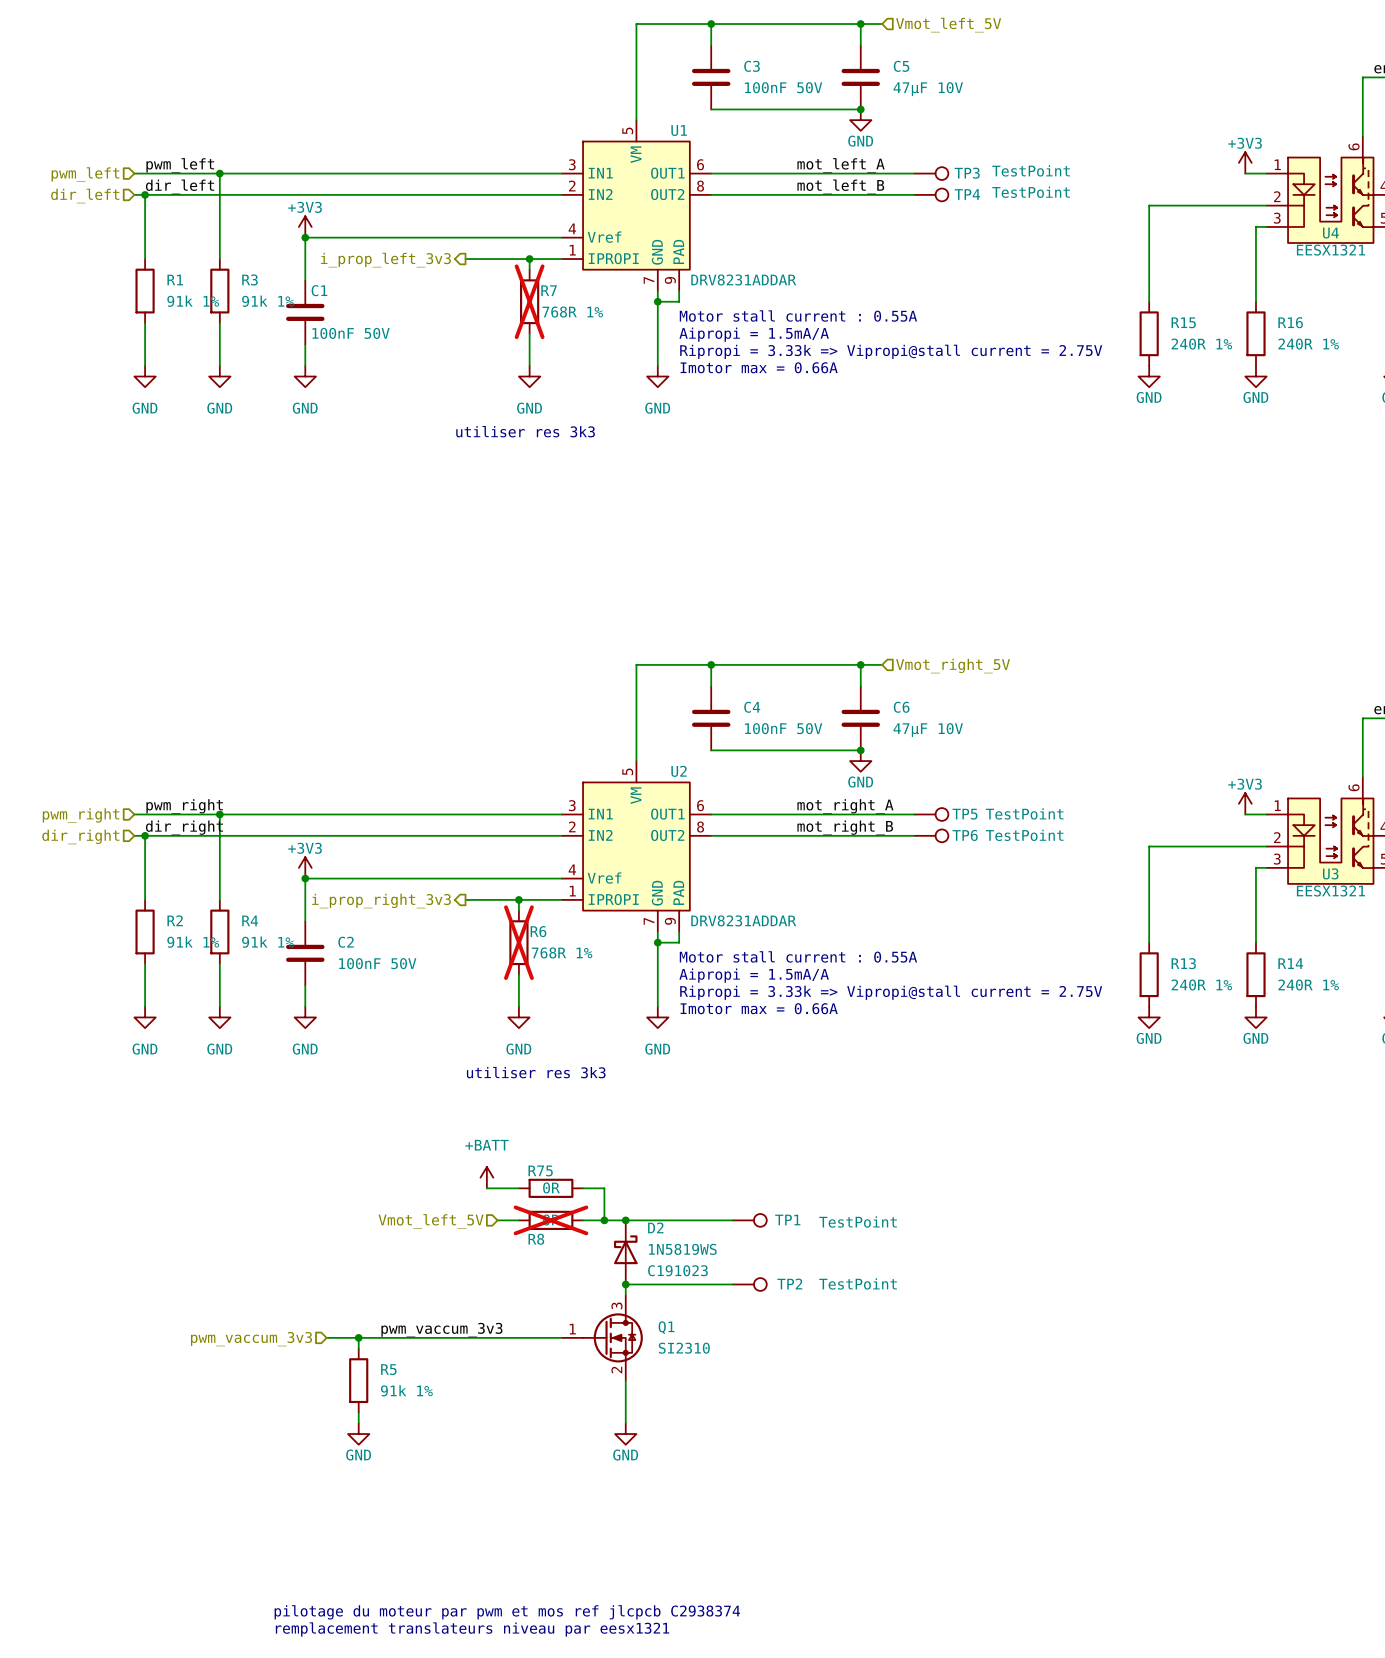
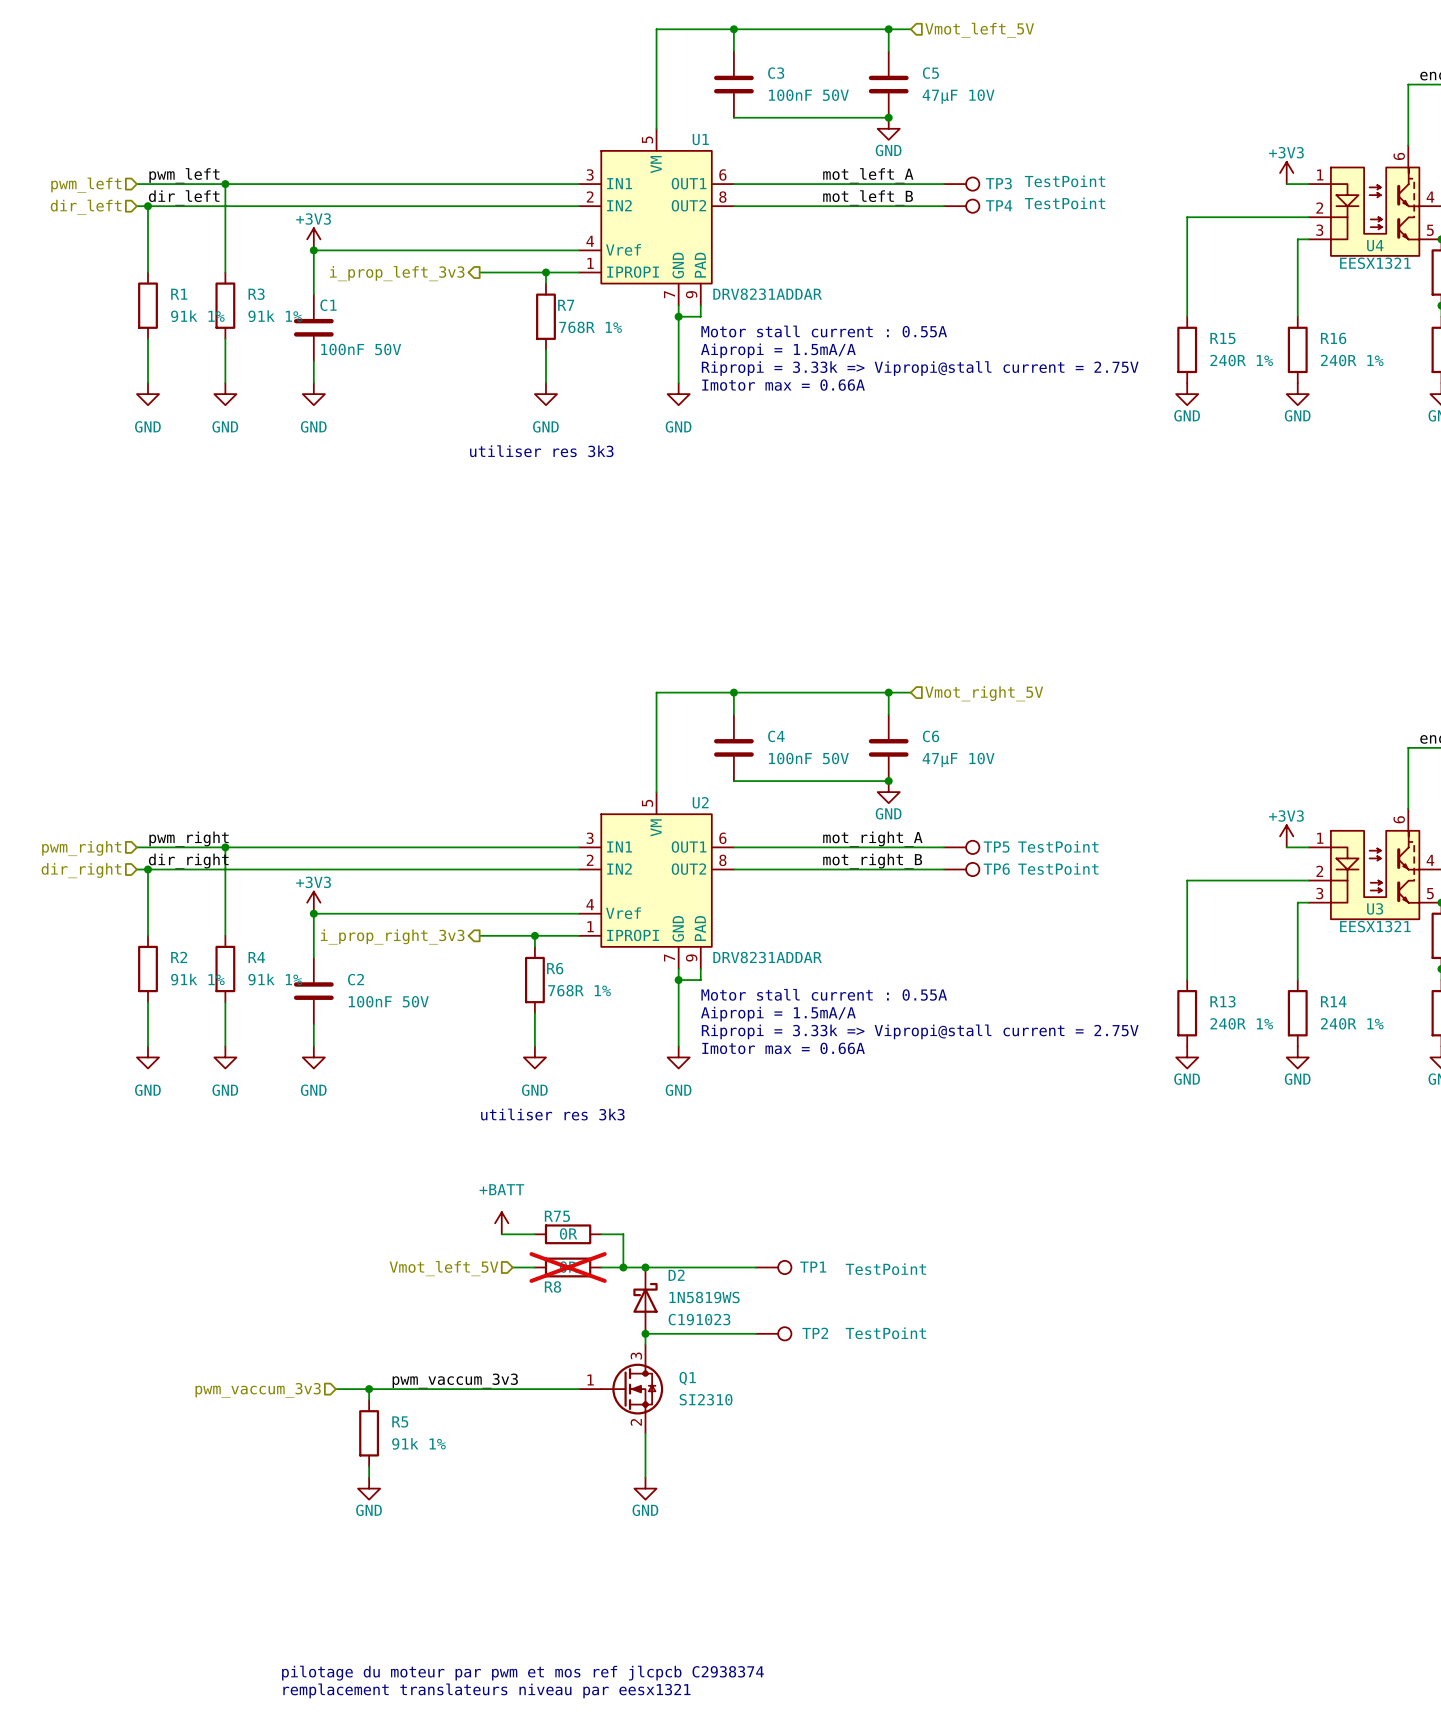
R7 do-not-place cross: (529, 301) -> none
R6 do-not-place cross: (518, 942) -> none

